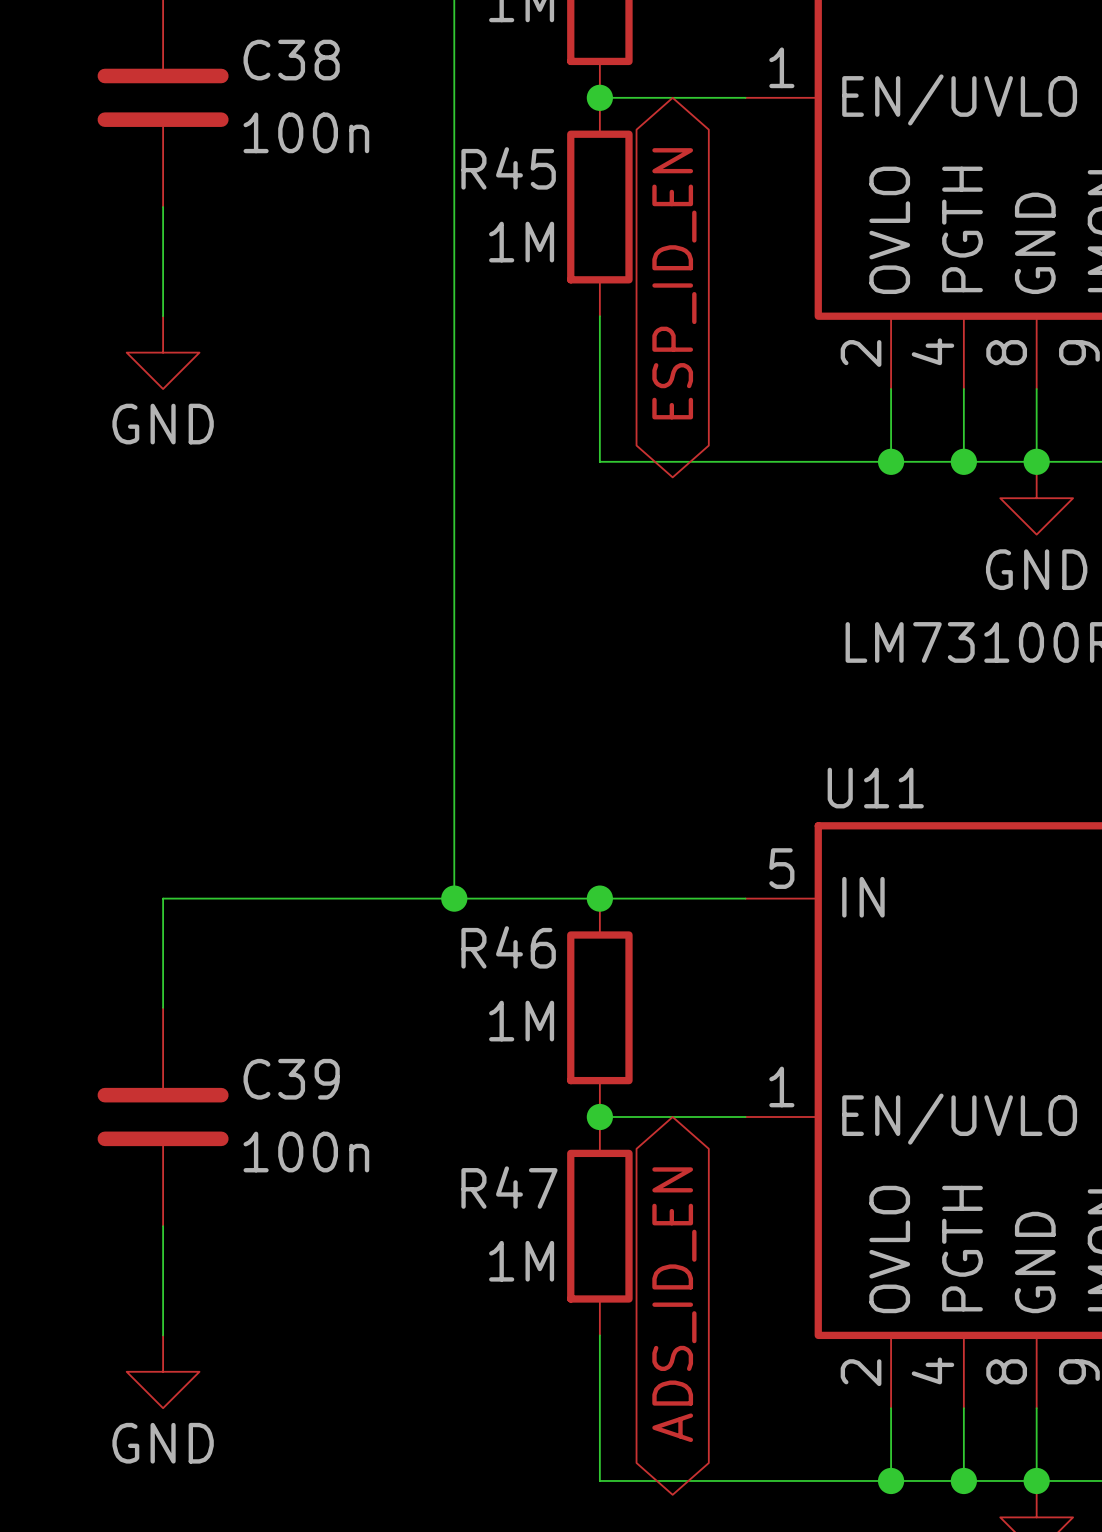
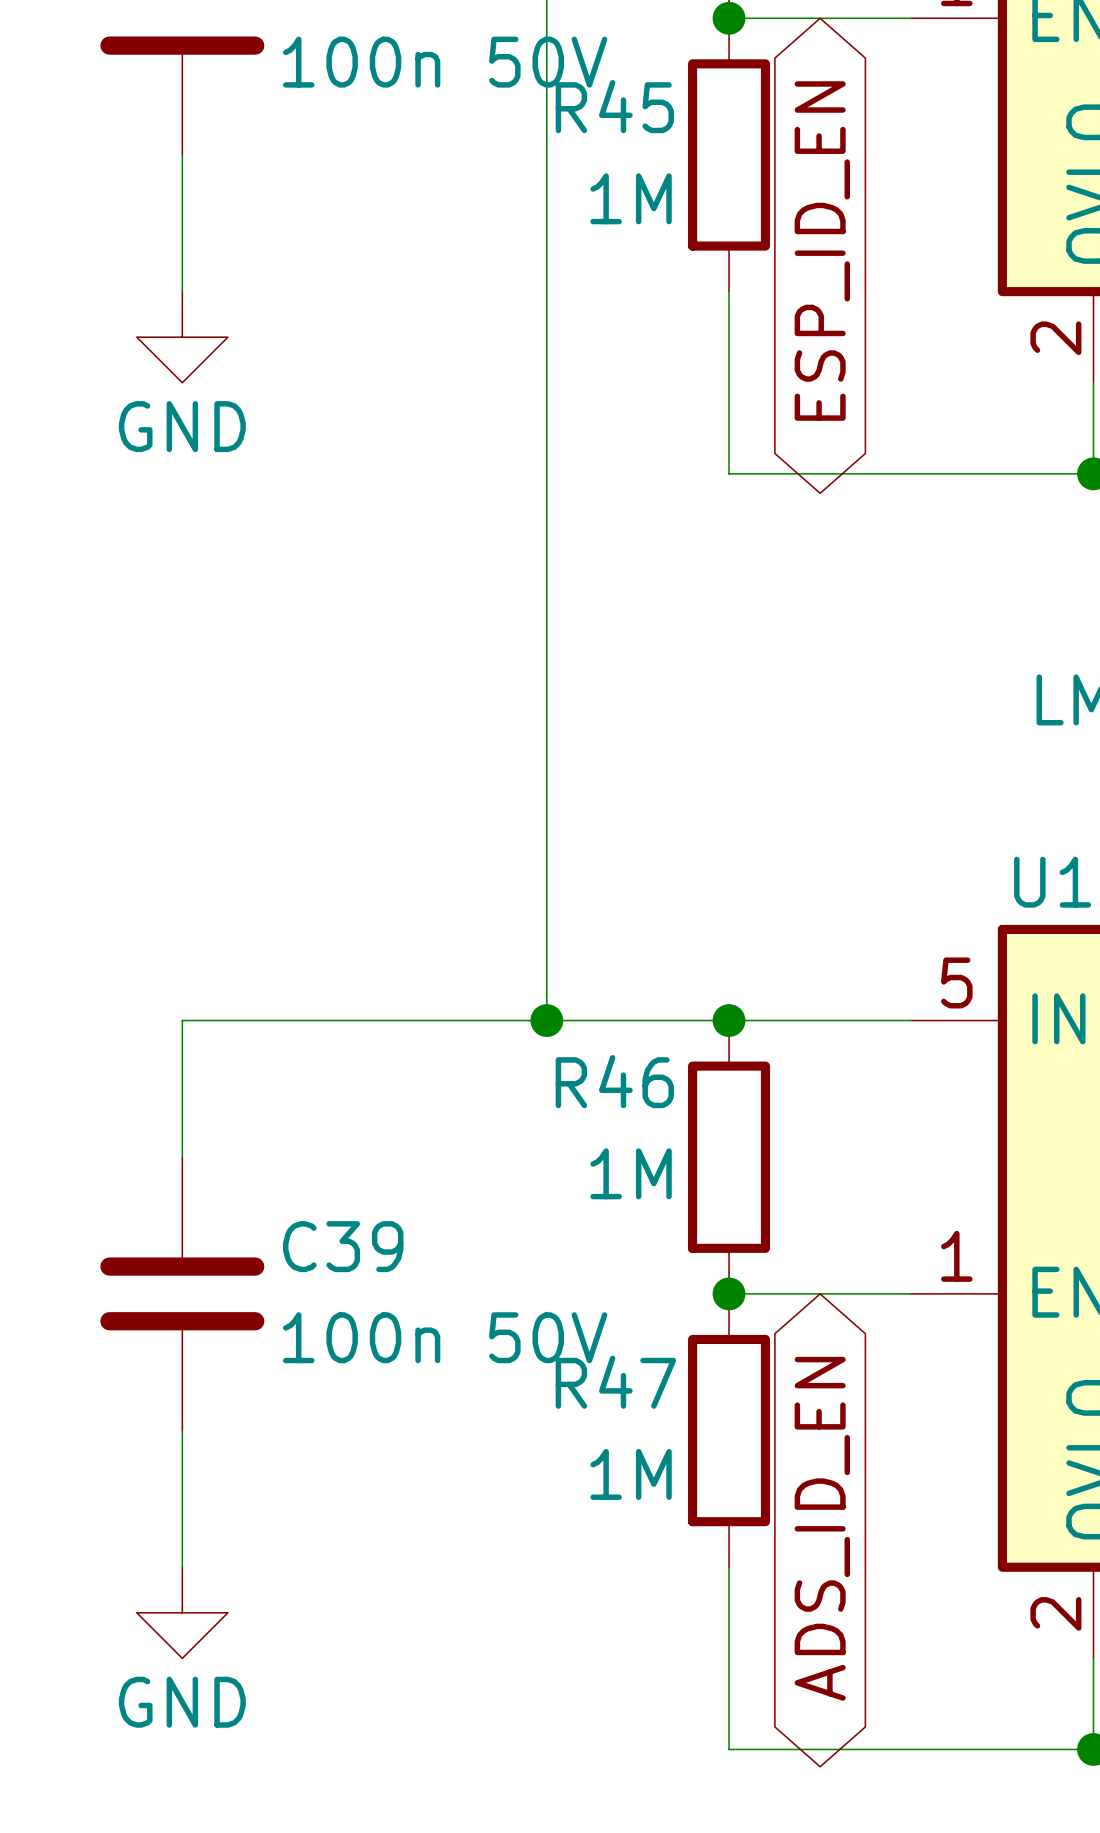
C38 value: 100n (306, 132) -> 100n 50V (445, 62)
C39 value: 100n (306, 1152) -> 100n 50V (445, 1337)

